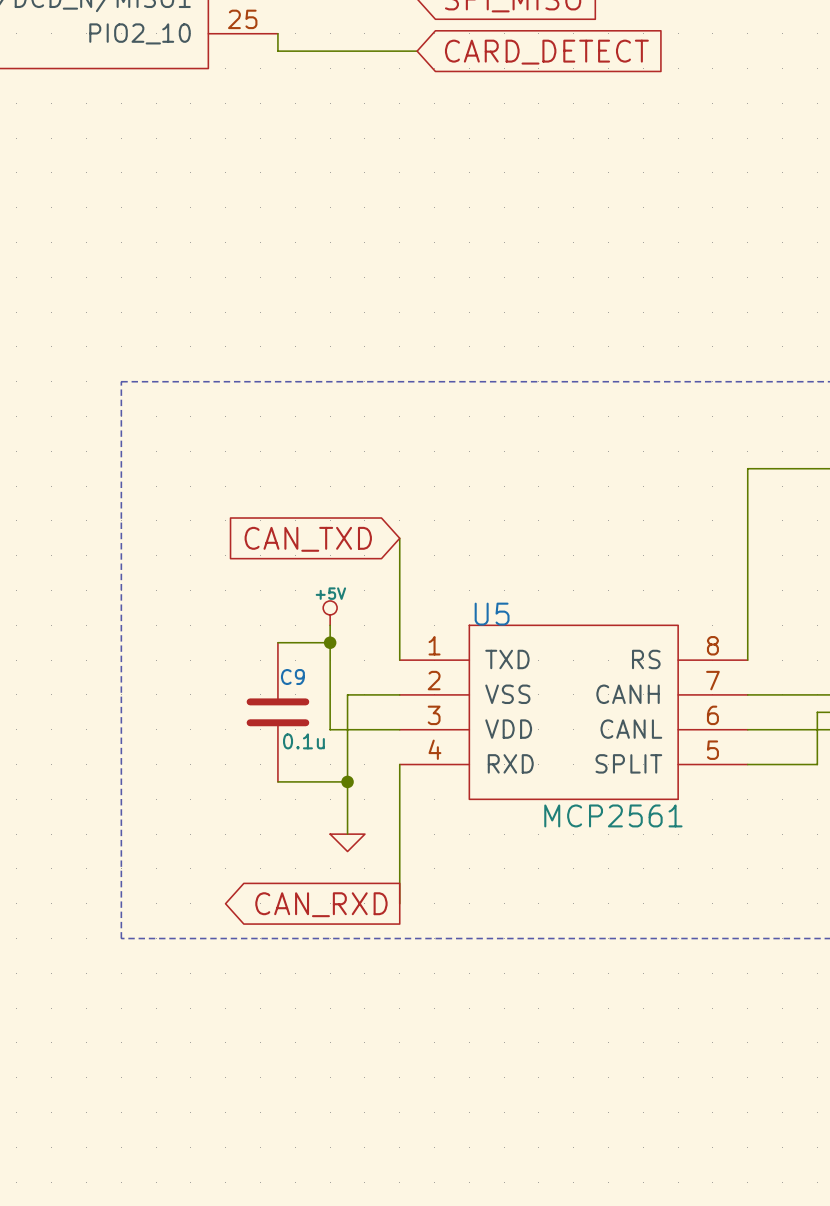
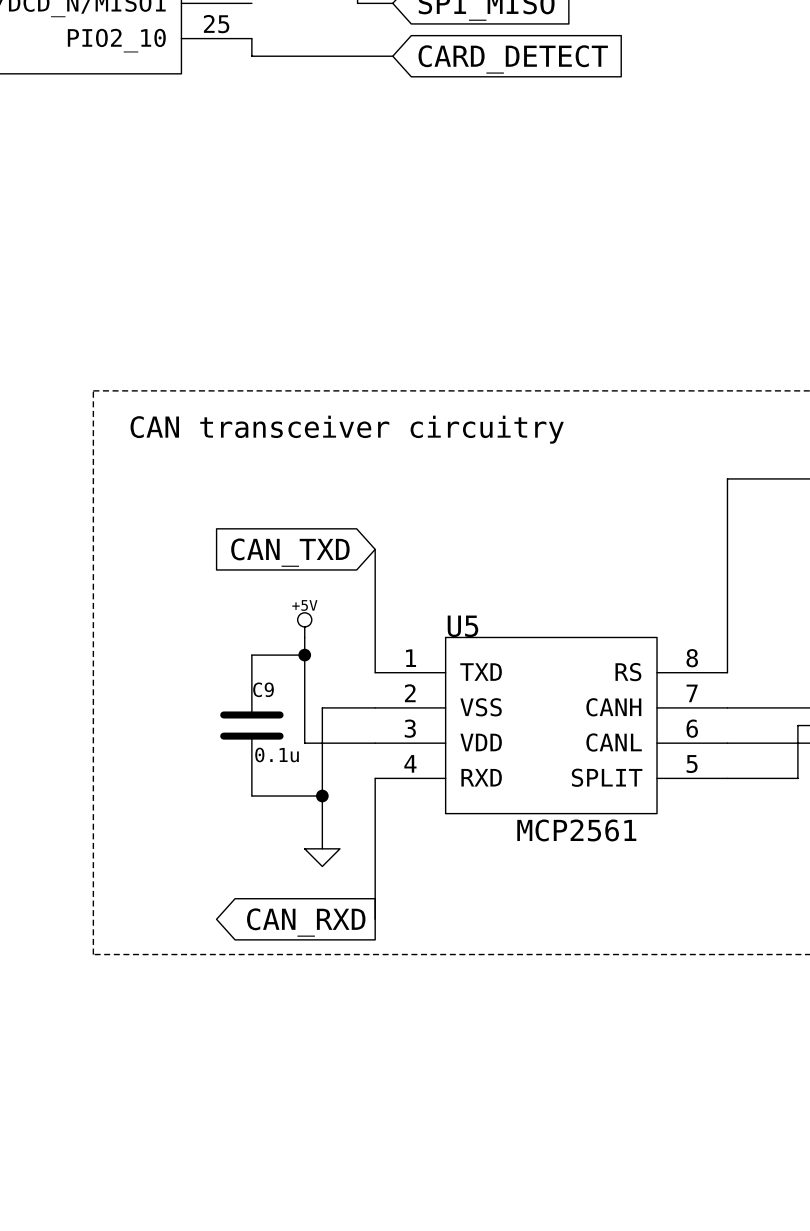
text: none -> CAN transceiver circuitry (347, 429)

